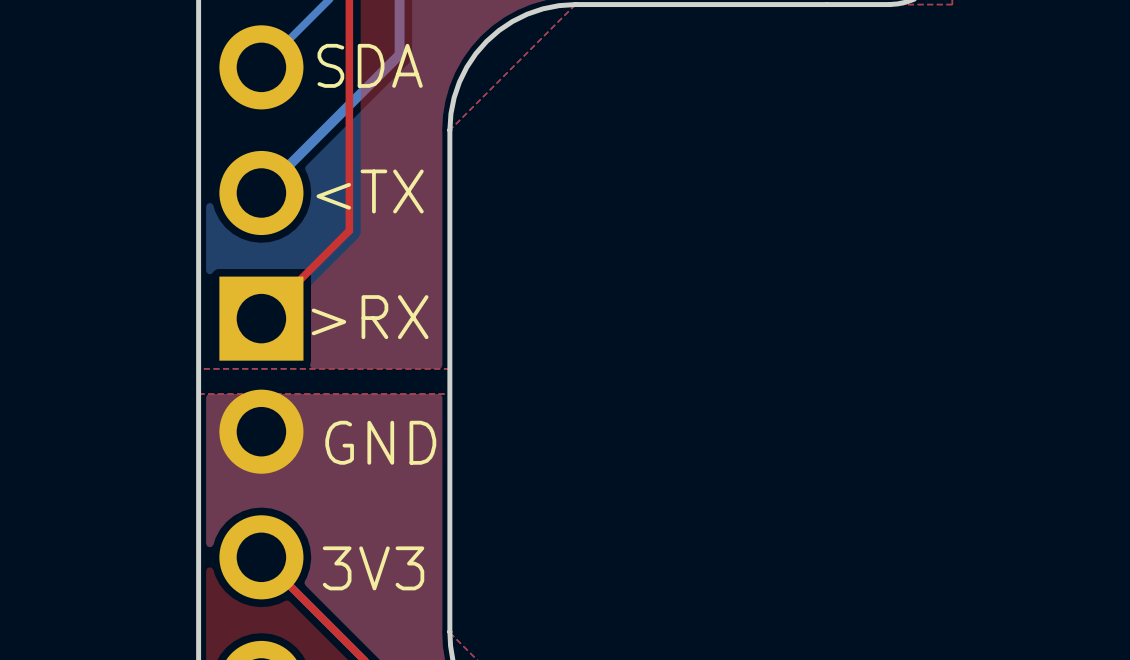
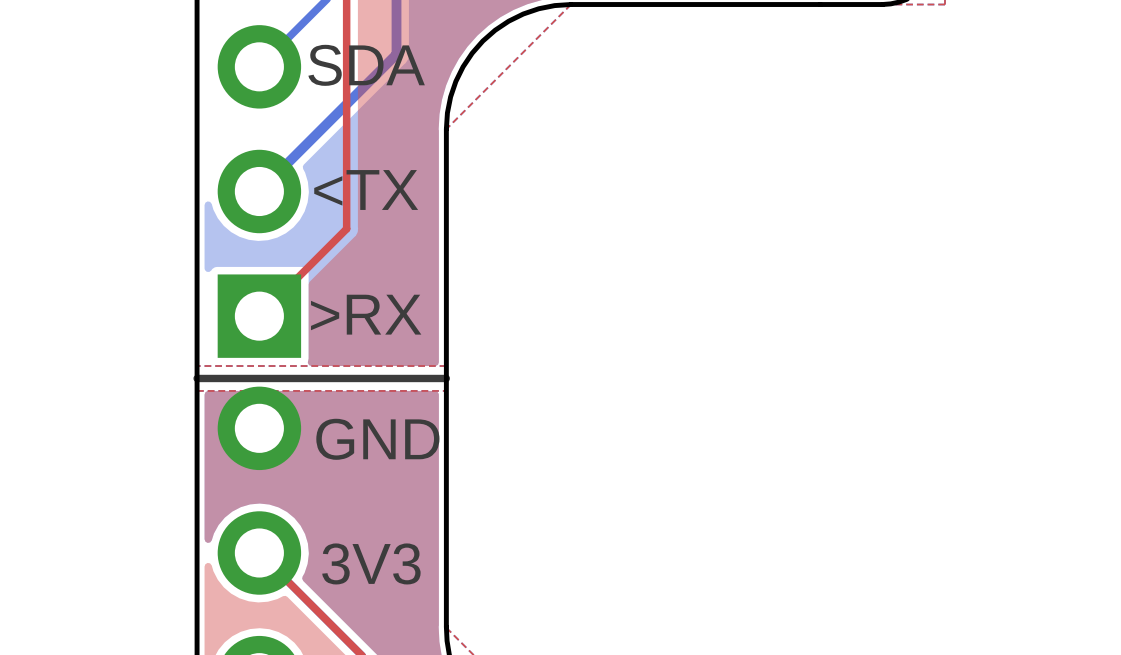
line: none -> (197, 378) (446, 378)

